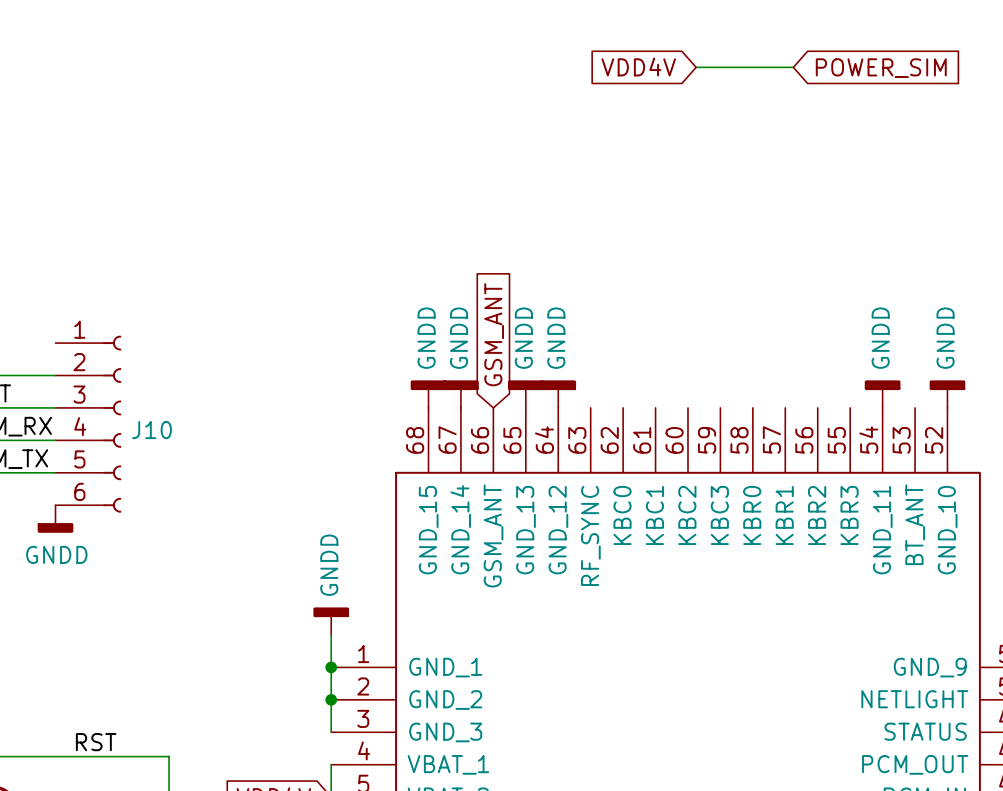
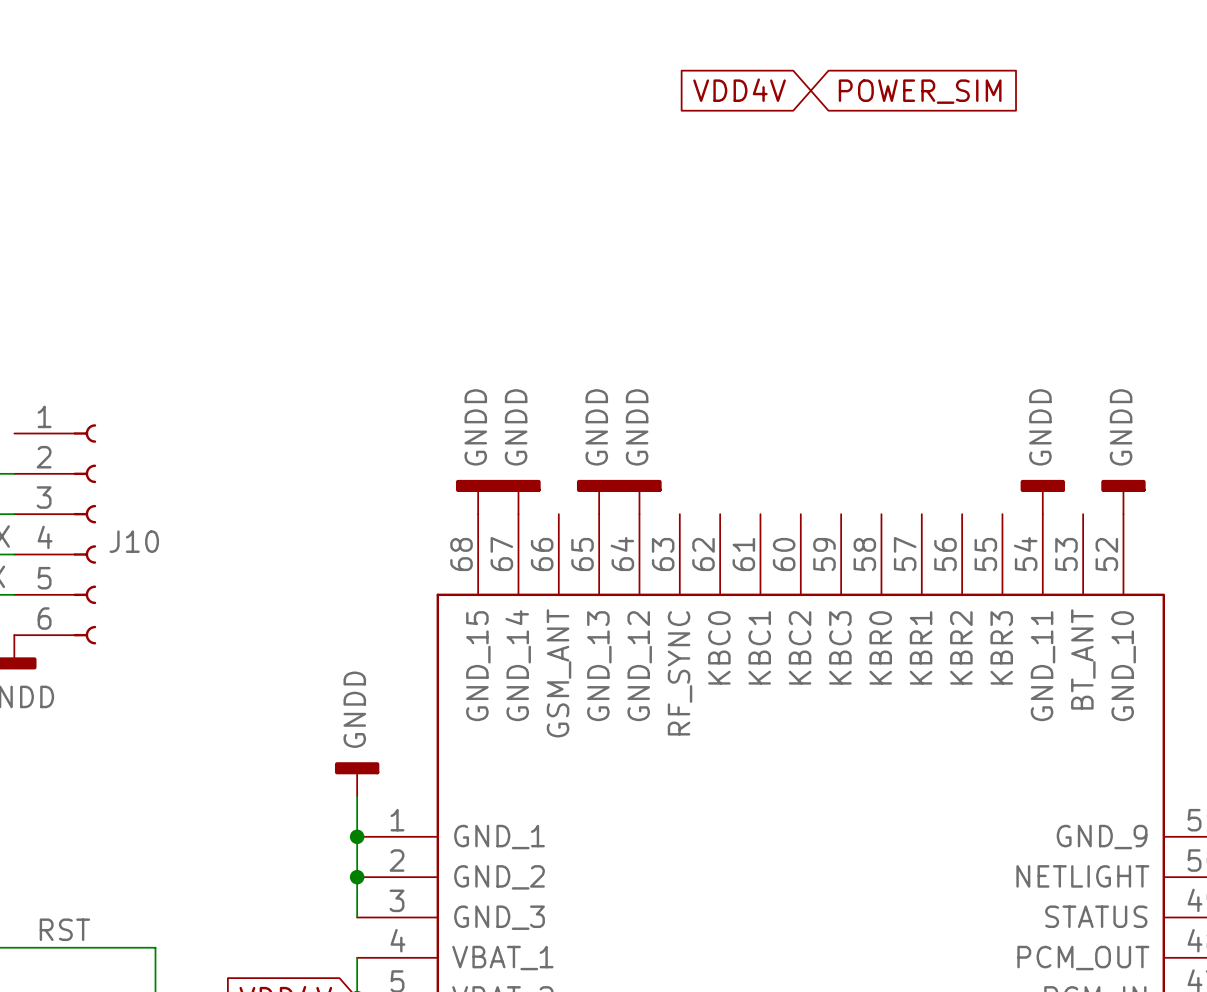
wire: (696, 67) (793, 67) -> none
global label position: POWER_SIM (881, 68) -> POWER_SIM (920, 91)
global label: GSM_ANT (494, 334) -> none

